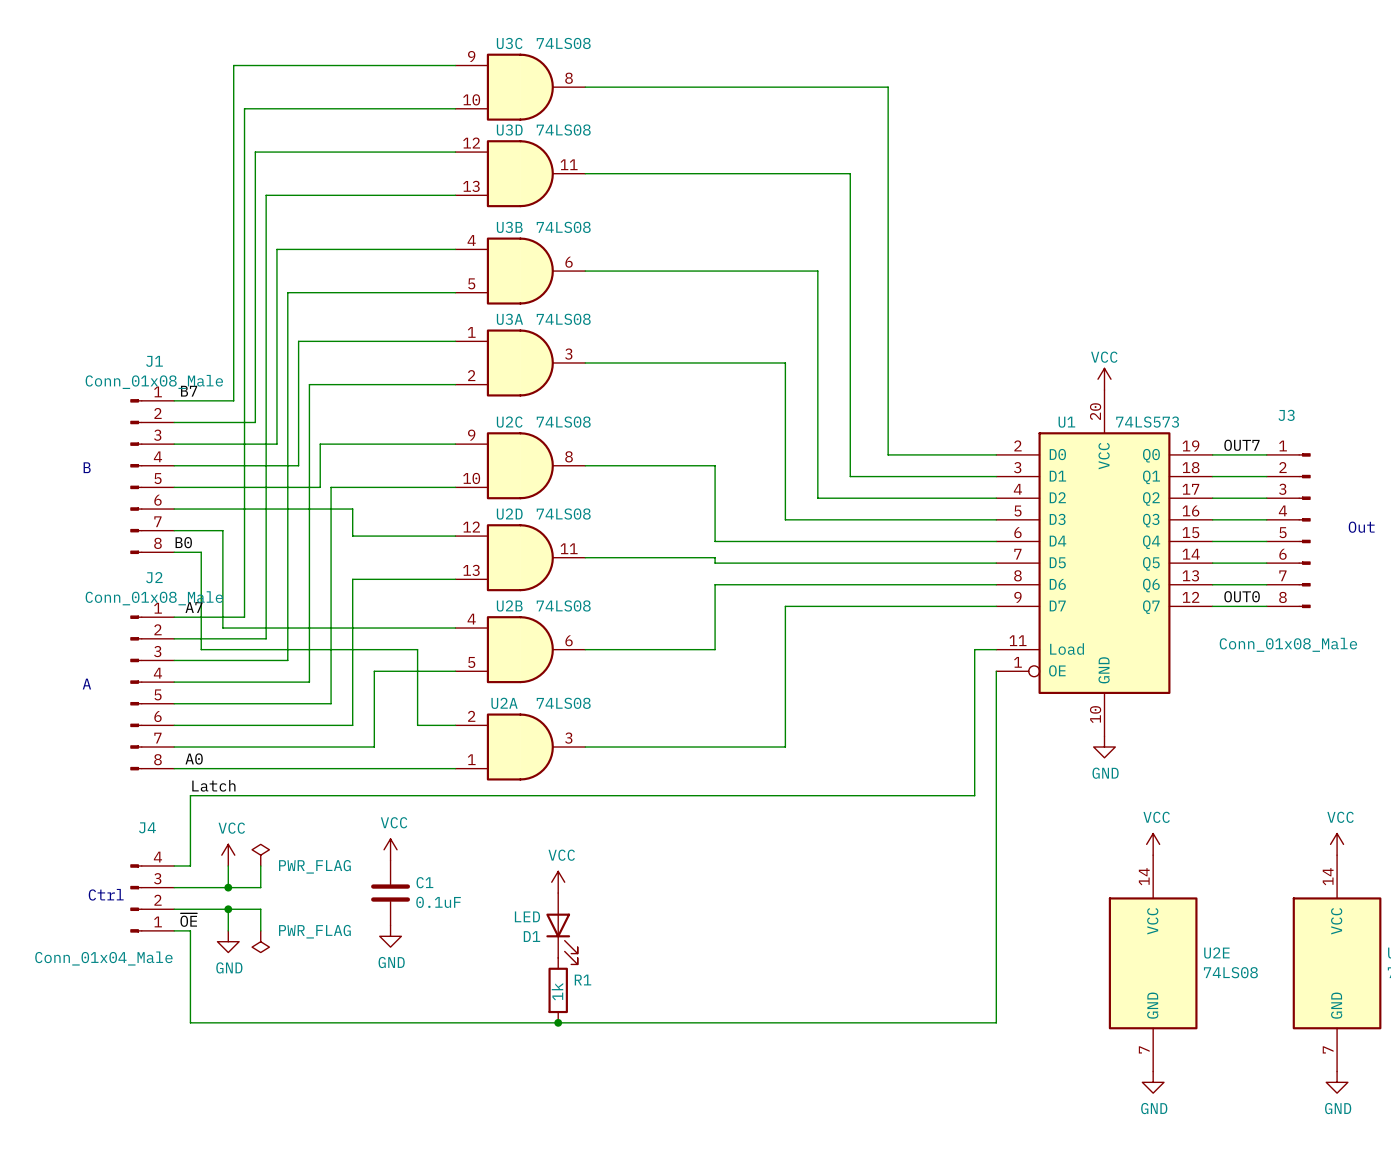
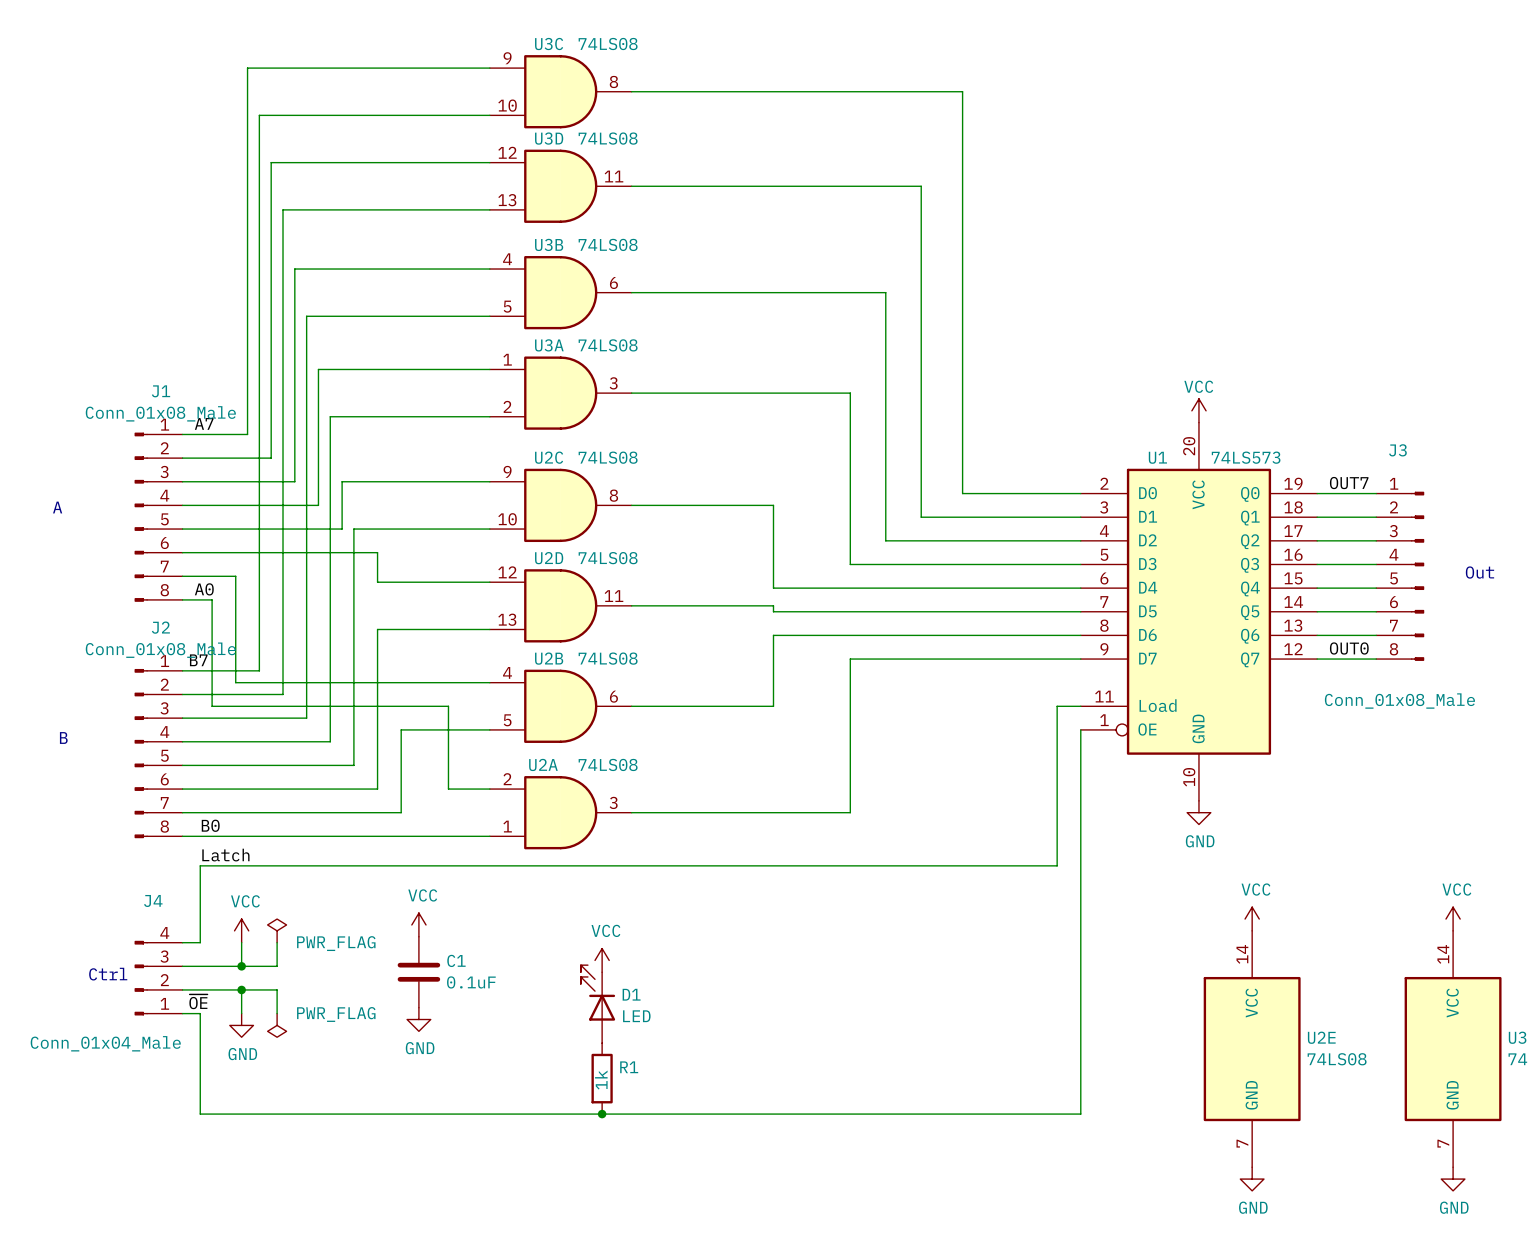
label: B7 (189, 391) -> A7 (204, 423)
text: none -> A (57, 507)
text position: B (87, 467) -> B (63, 737)
label: B0 (183, 542) -> none
label: none -> A0 (204, 589)
label: A7 (194, 607) -> B7 (198, 660)
text: A (86, 684) -> none
label: A0 (194, 758) -> B0 (210, 825)
D1 rotation: 0° (562, 939) -> 180° (597, 992)

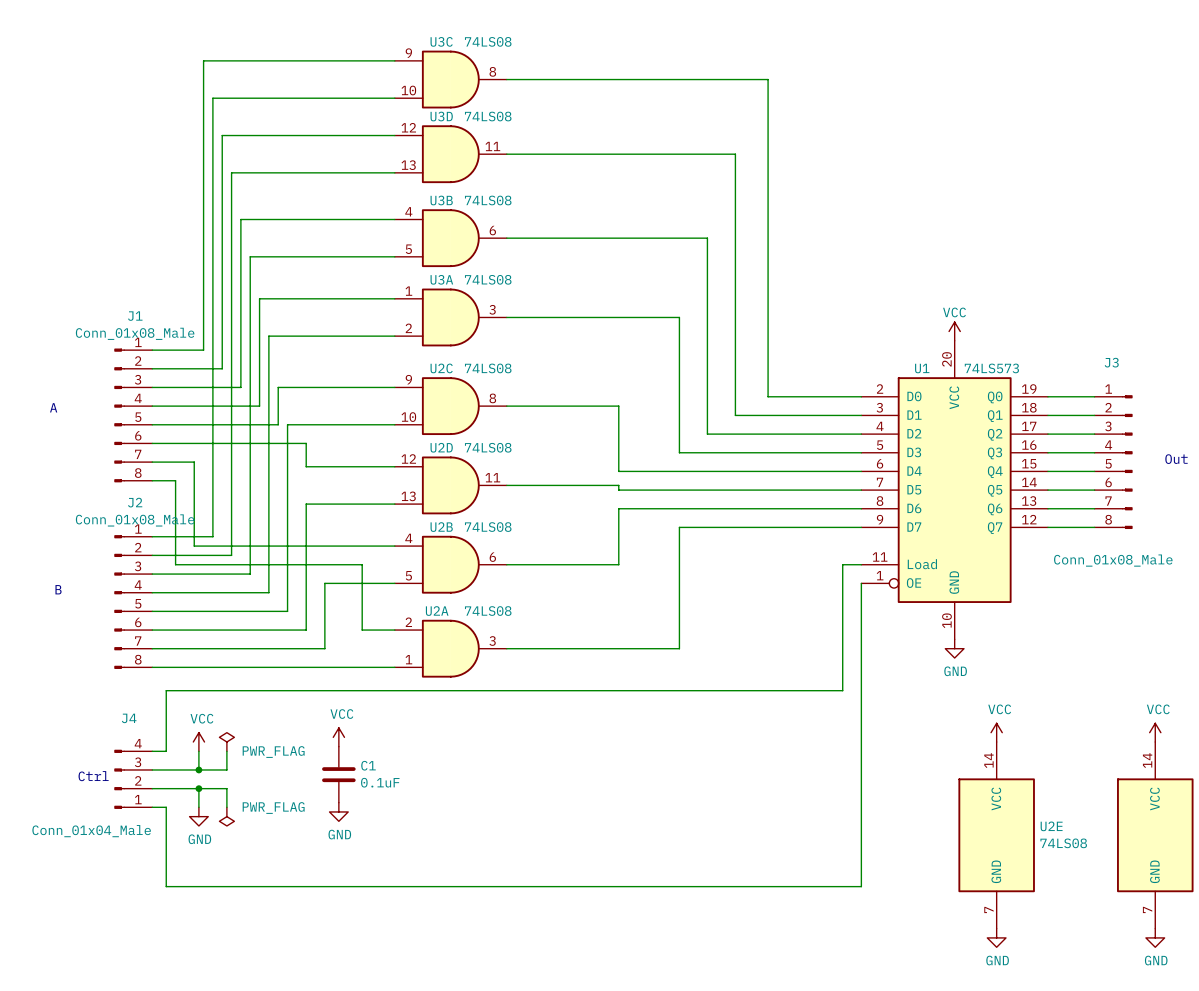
label: A7 (204, 423) -> none
label: OUT7 (1349, 483) -> none
label: A0 (204, 589) -> none
label: OUT0 (1349, 648) -> none
label: B7 (198, 660) -> none
label: B0 (210, 825) -> none
label: Latch (225, 855) -> none
power symbol: VCC (602, 960) -> none
label: ~{OE} (198, 1001) -> none
D1: LED (597, 1004) -> none
R1: 1k (602, 1078) -> none
junction: (602, 1114) -> none

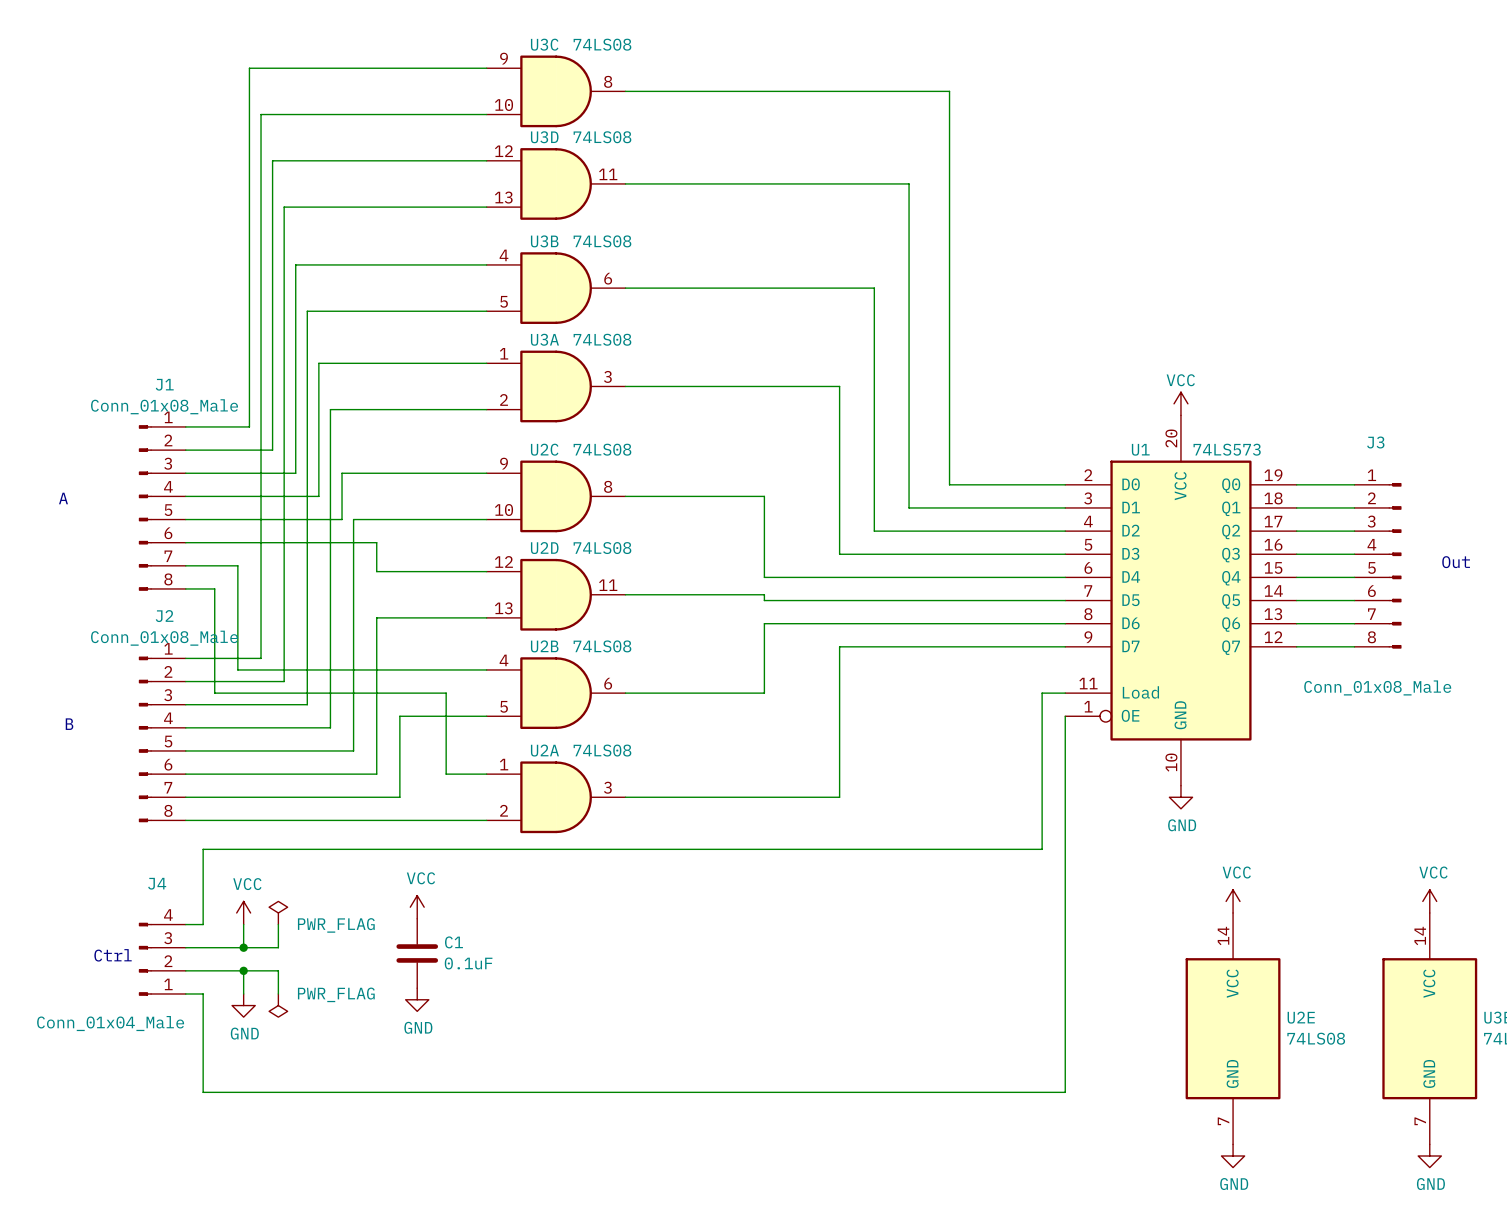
U2A flip: as is (450, 648) -> up-down (556, 797)

